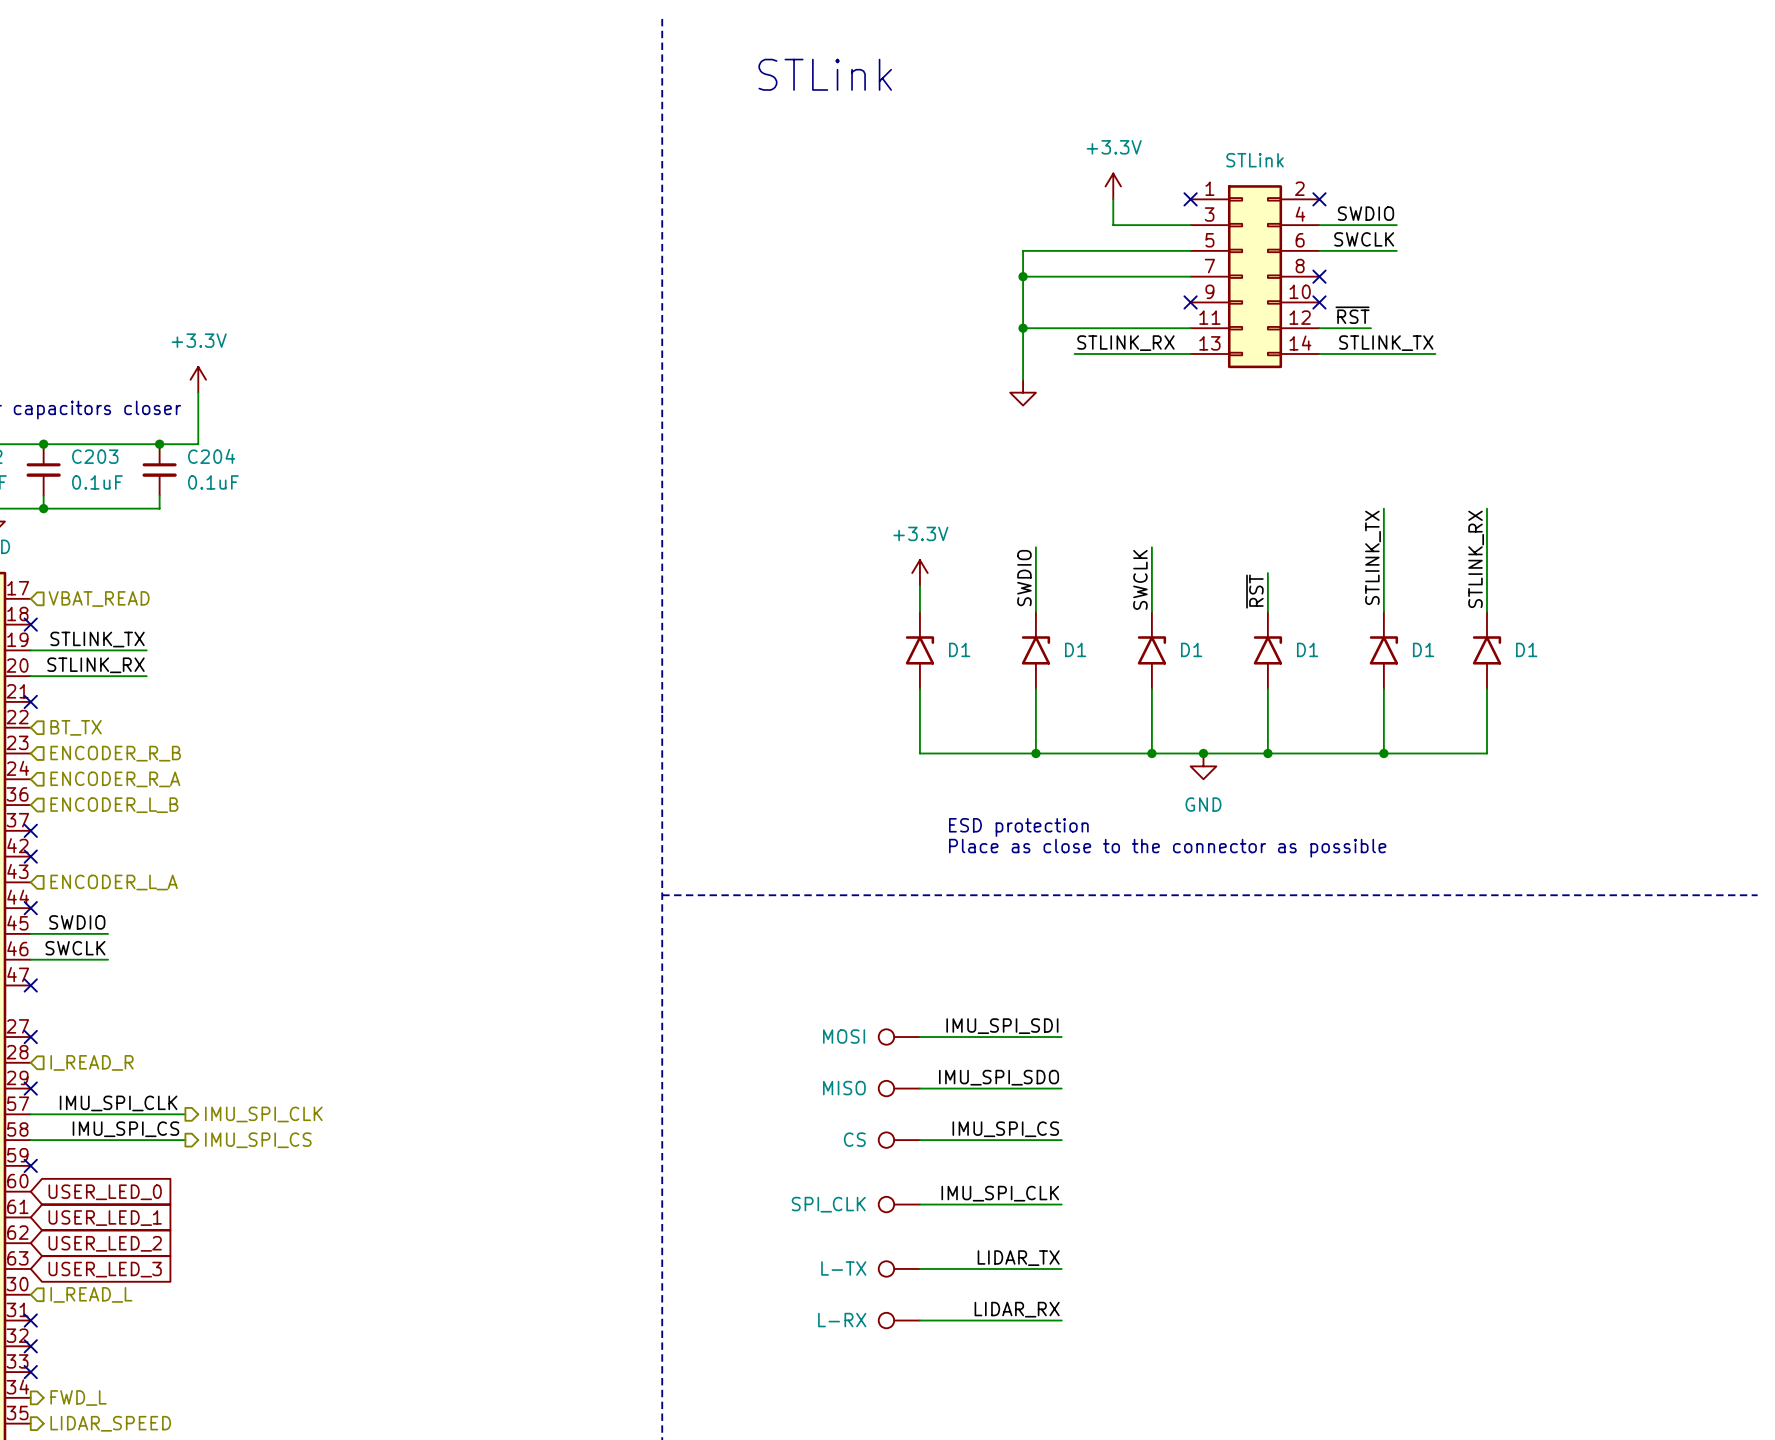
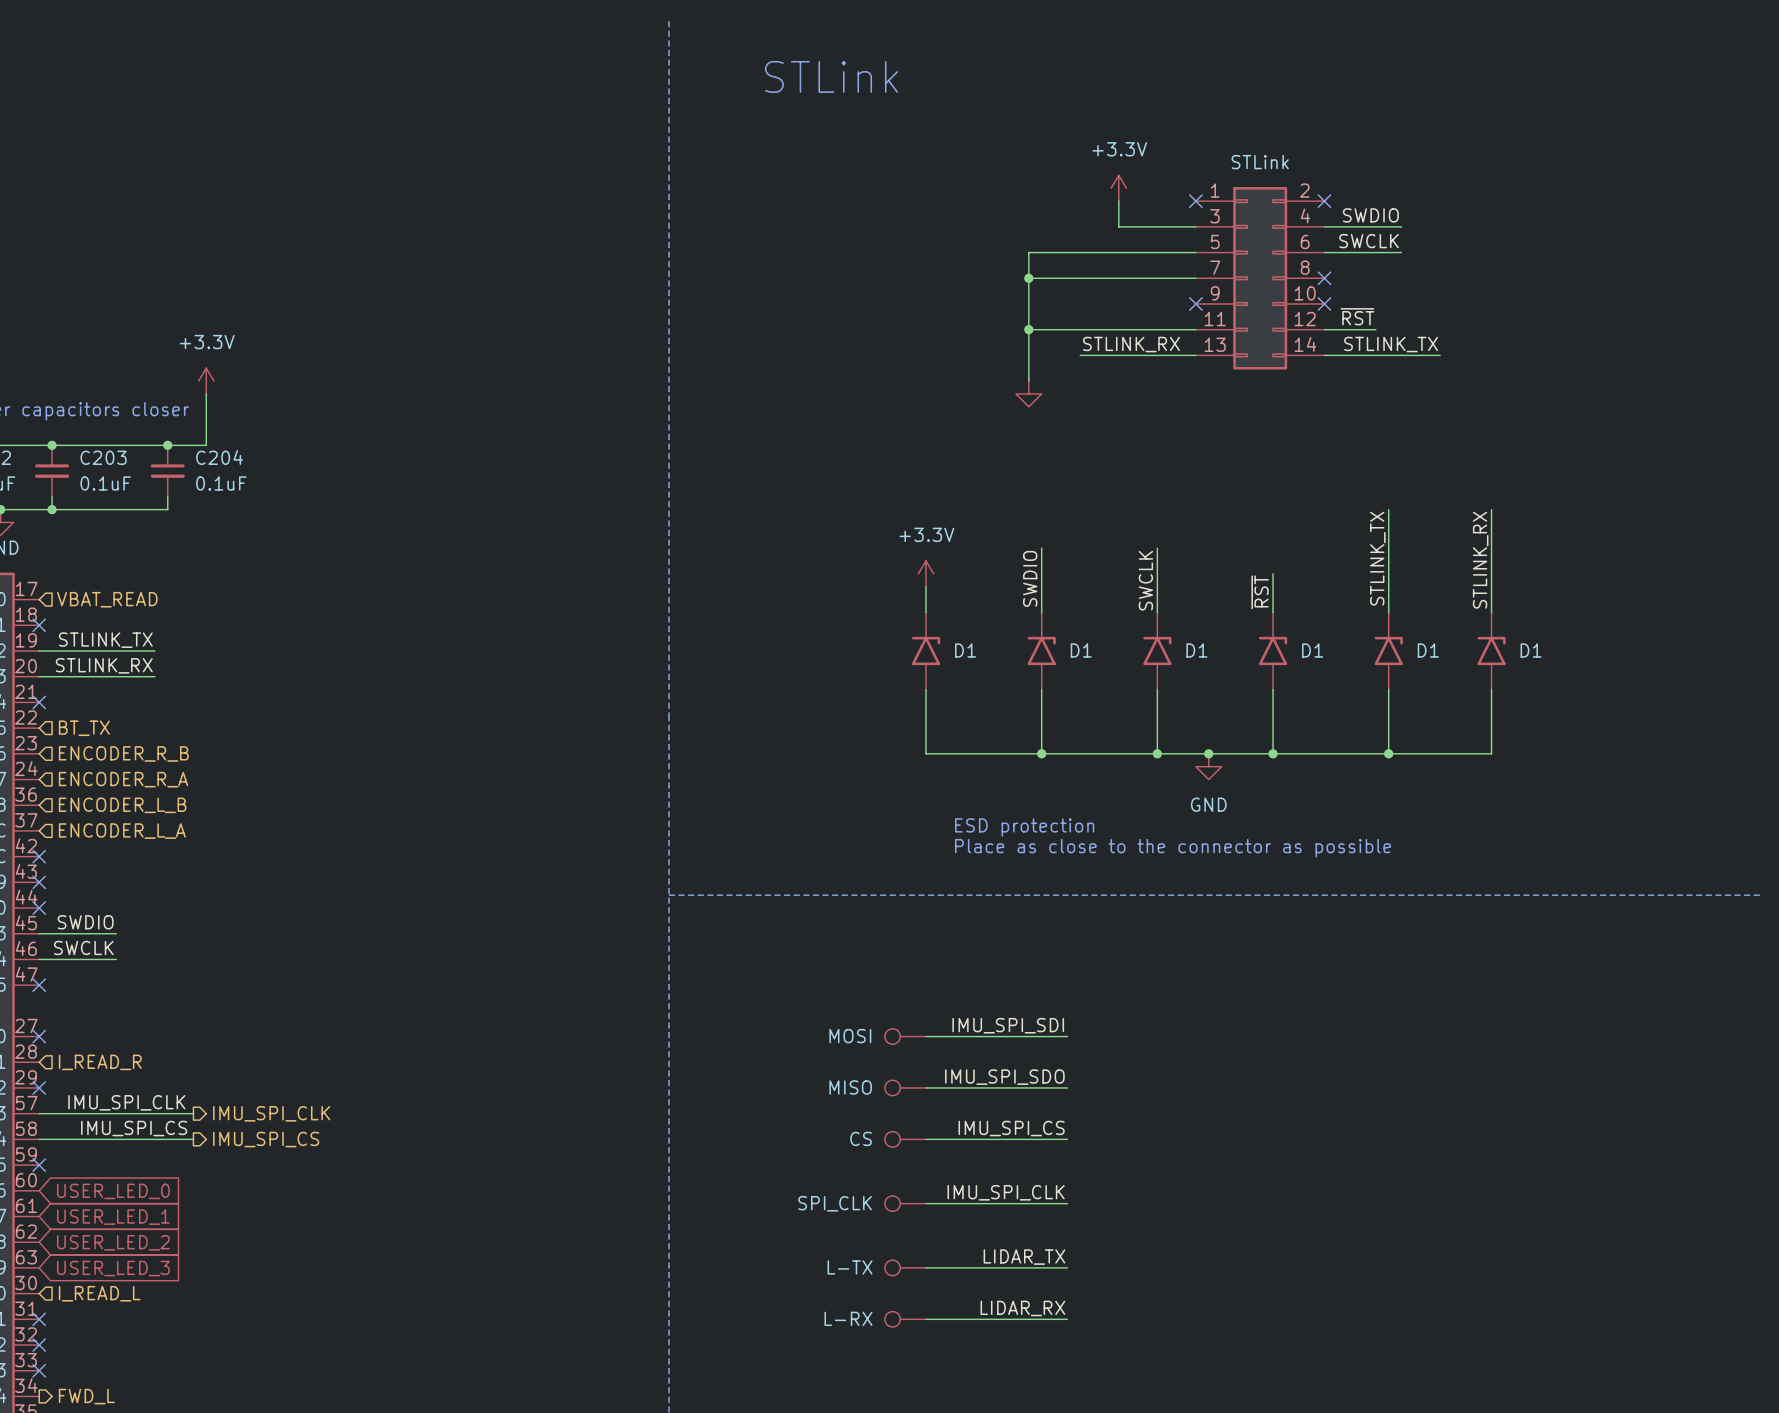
no-connect mark position: (30, 830) -> (39, 882)
hierarchical label position: ENCODER_L_A (114, 882) -> ENCODER_L_A (122, 831)

